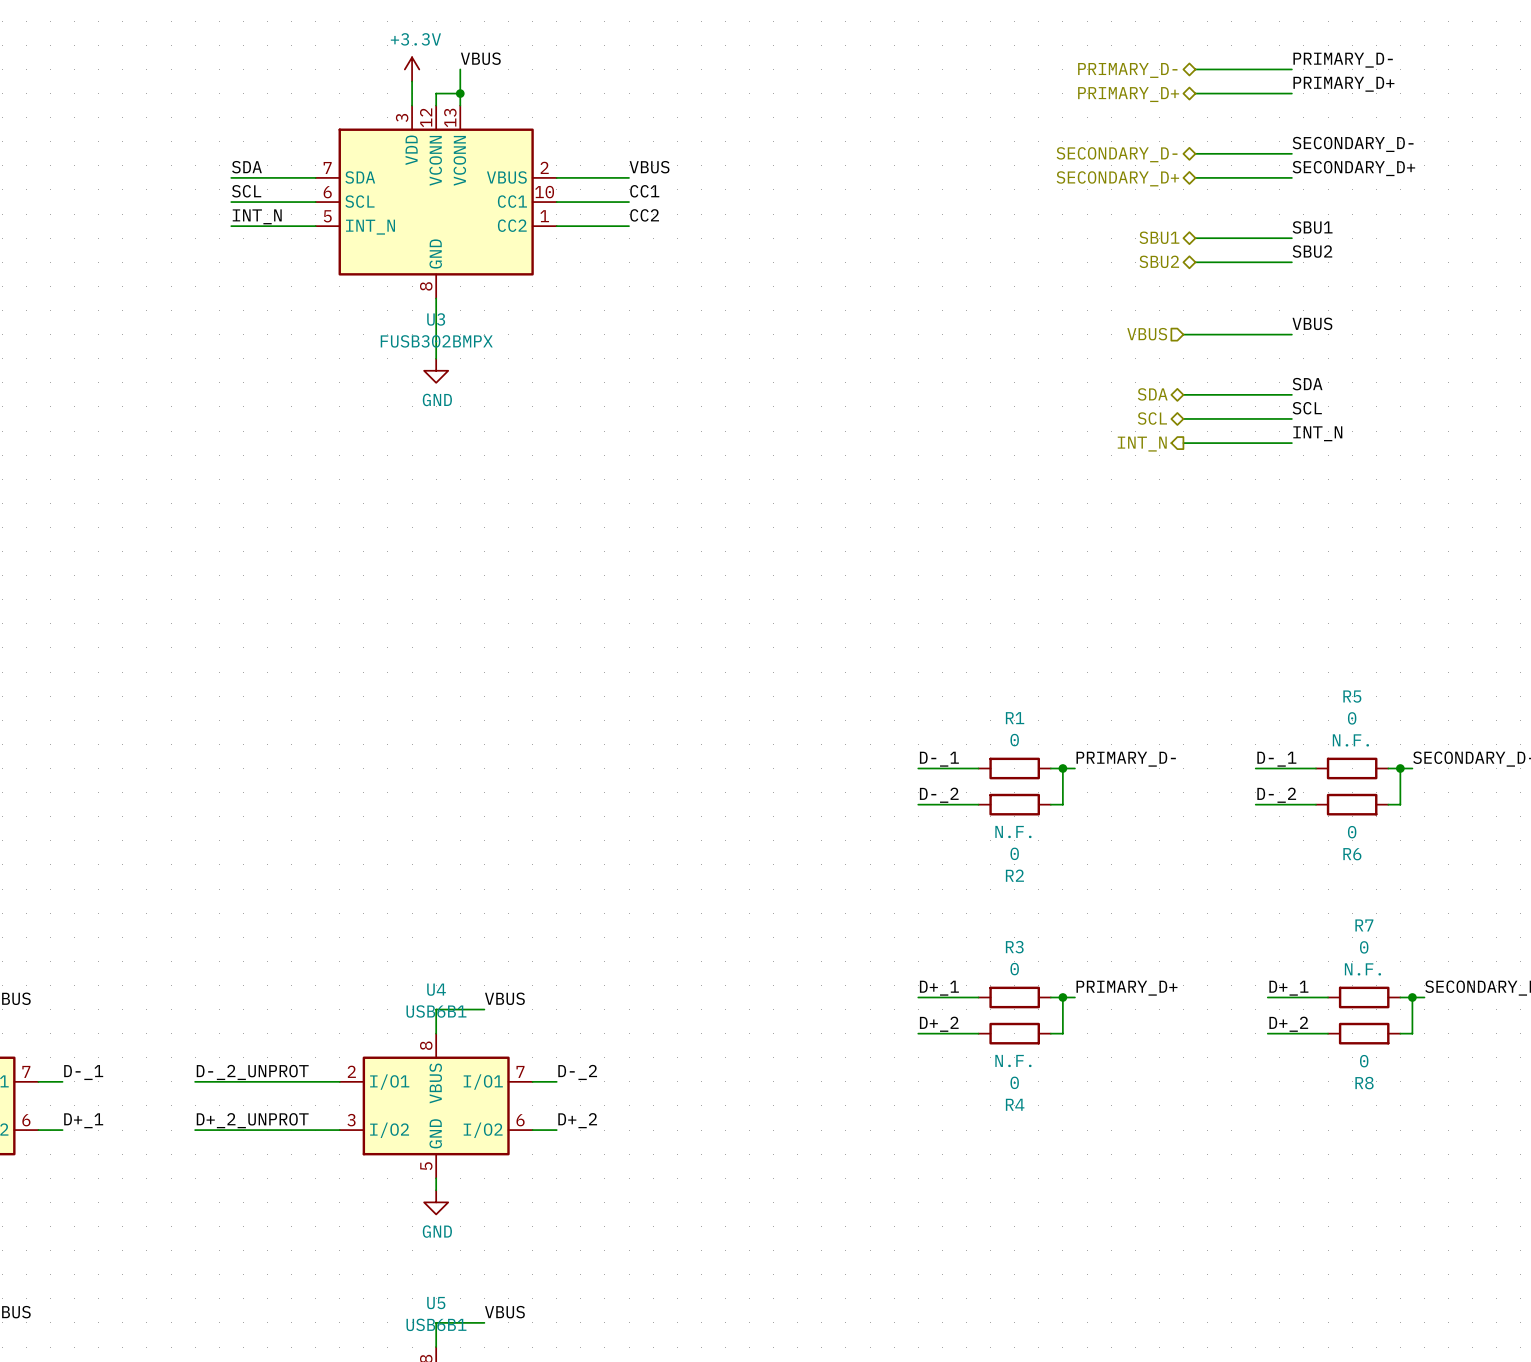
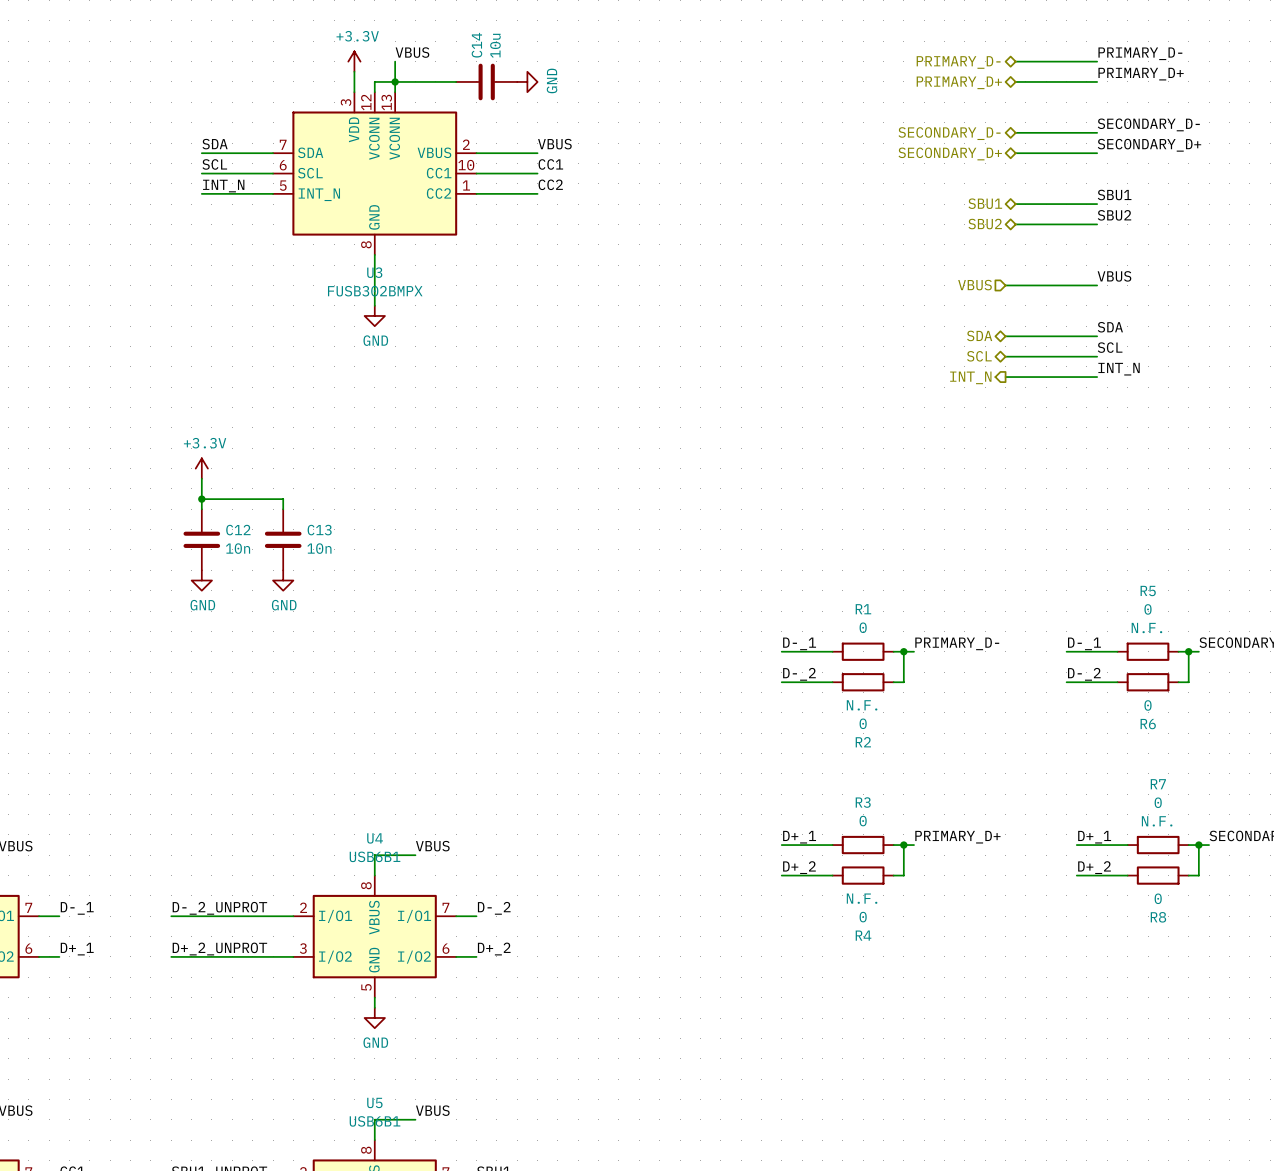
wire: none -> (395, 81) (456, 81)
C14: none -> 10u (486, 81)
power symbol: none -> GND (527, 81)
power symbol: none -> +3.3V (201, 468)
wire: none -> (201, 478) (201, 509)
wire: none -> (201, 499) (283, 499) (283, 509)
junction: none -> (201, 499)
C12: none -> 10n (201, 539)
C13: none -> 10n (283, 539)
power symbol: none -> GND (201, 580)
power symbol: none -> GND (283, 580)

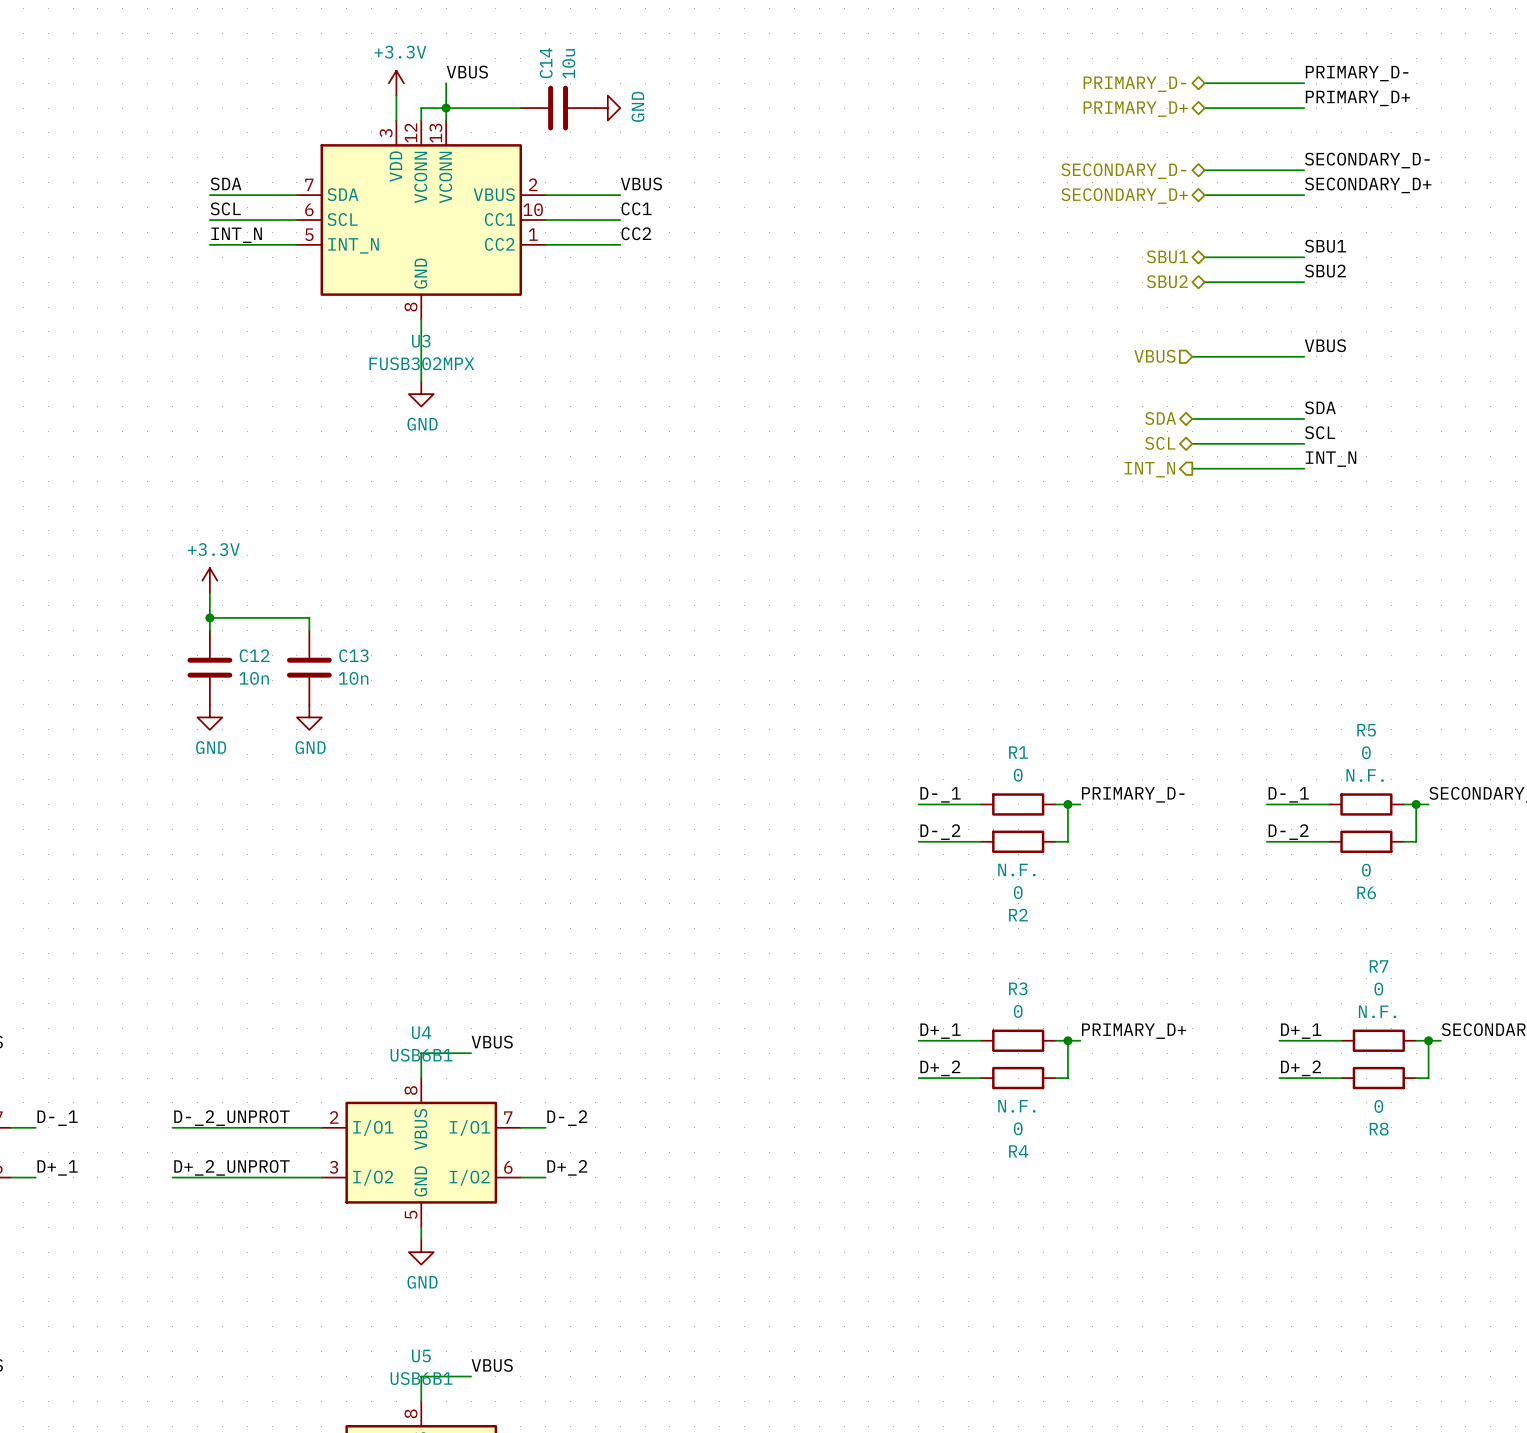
U3 value: FUSB302BMPX (375, 291) -> FUSB302MPX (421, 363)

